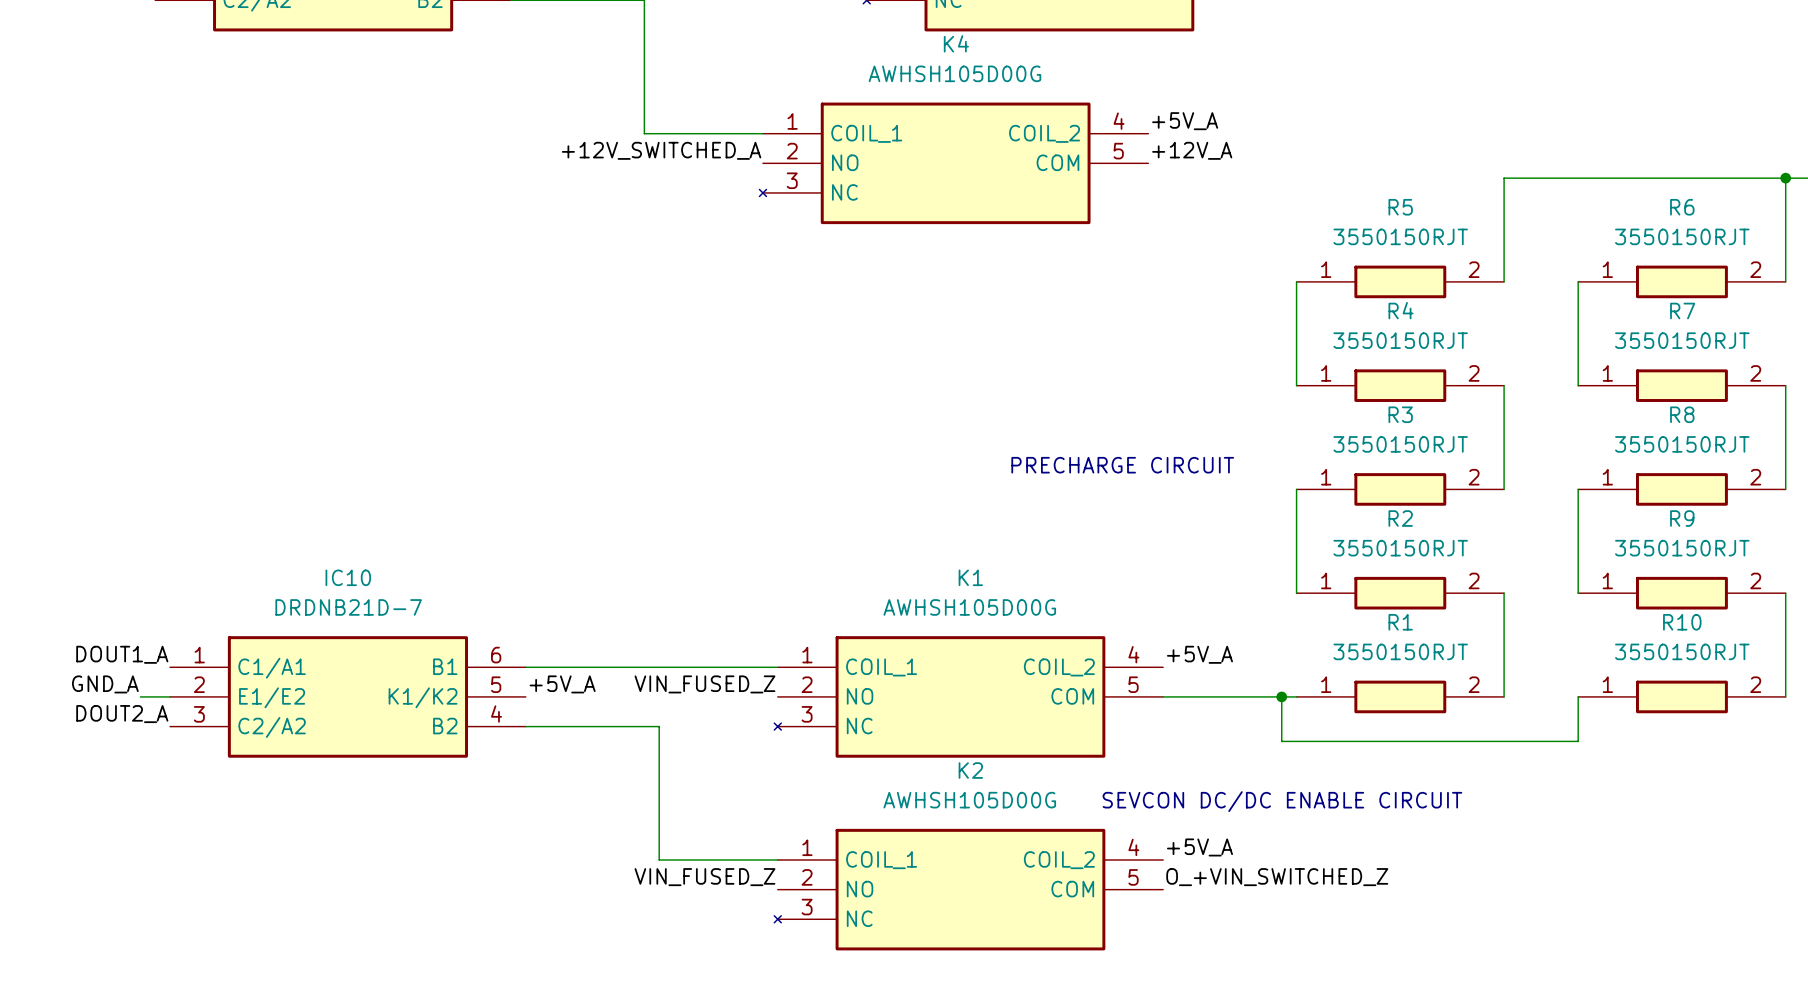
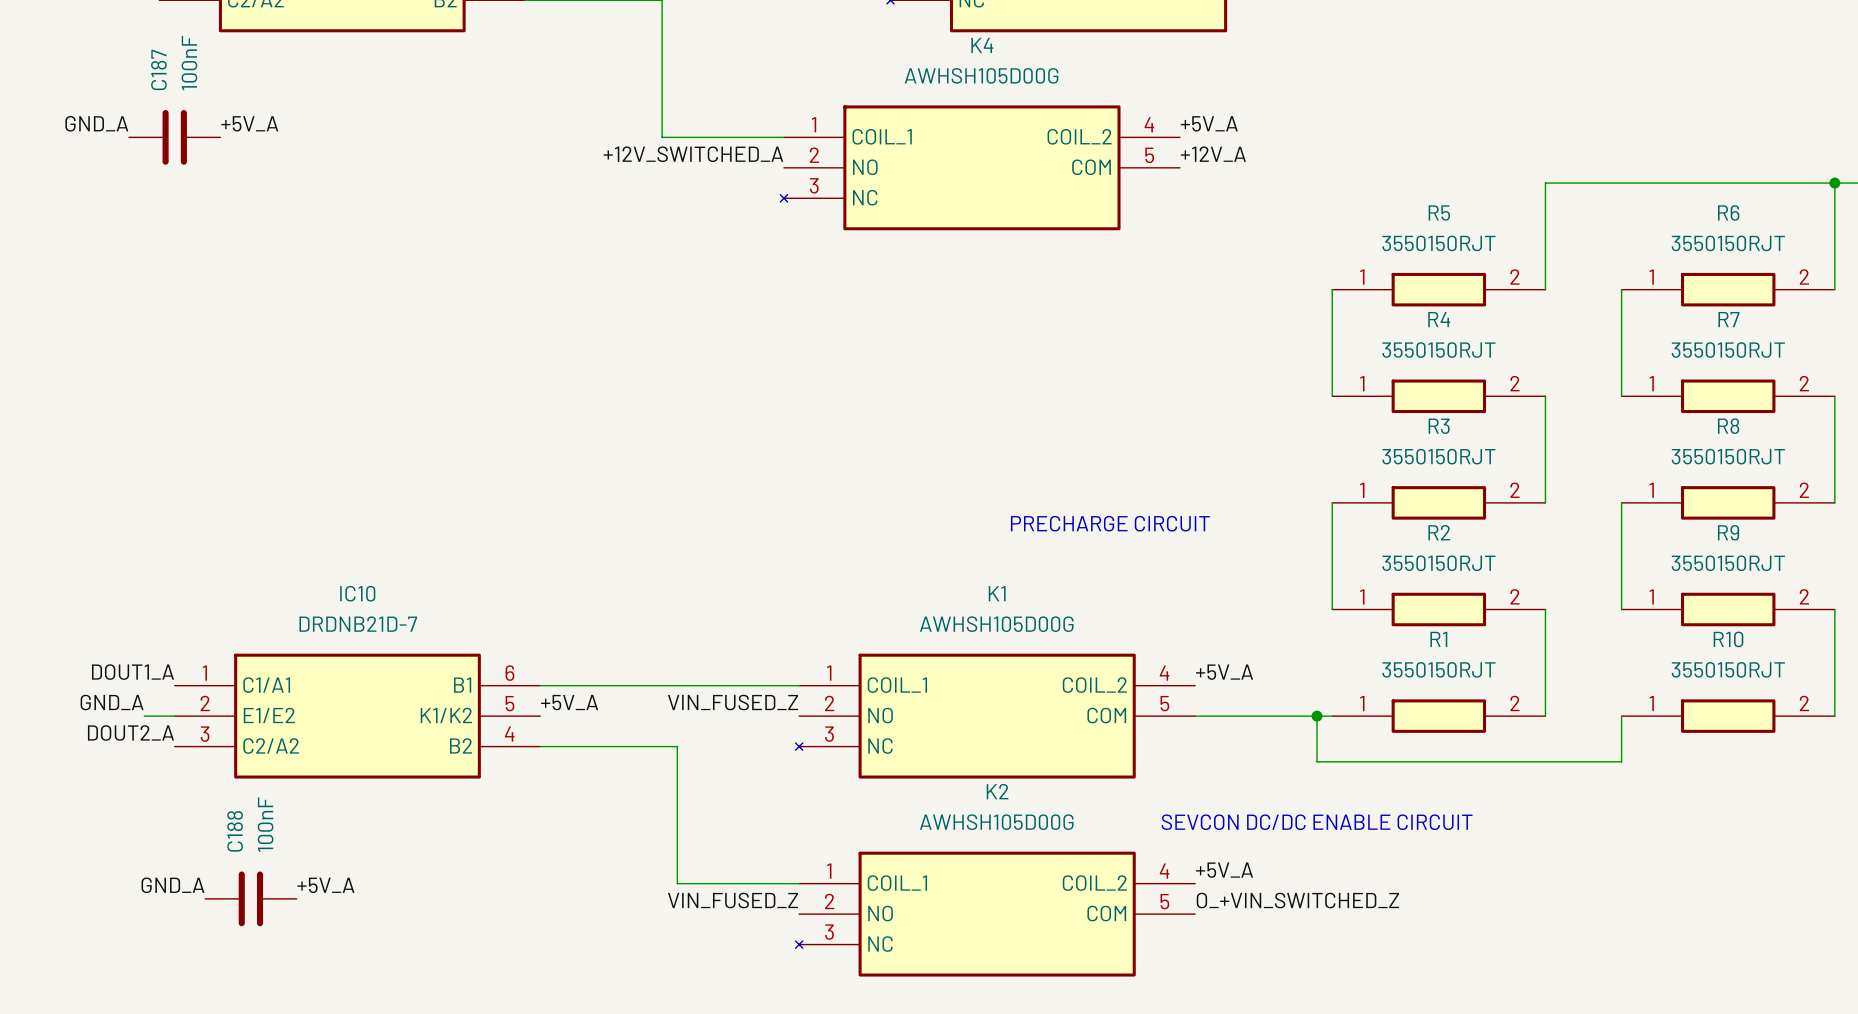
label: none -> GND_A (96, 123)
label: none -> +5V_A (249, 123)
C187: none -> 100nF (174, 137)
text position: PRECHARGE CIRCUIT (1122, 465) -> PRECHARGE CIRCUIT (1110, 523)
label: none -> GND_A (172, 885)
label: none -> +5V_A (325, 885)
C188: none -> 100nF (250, 898)

